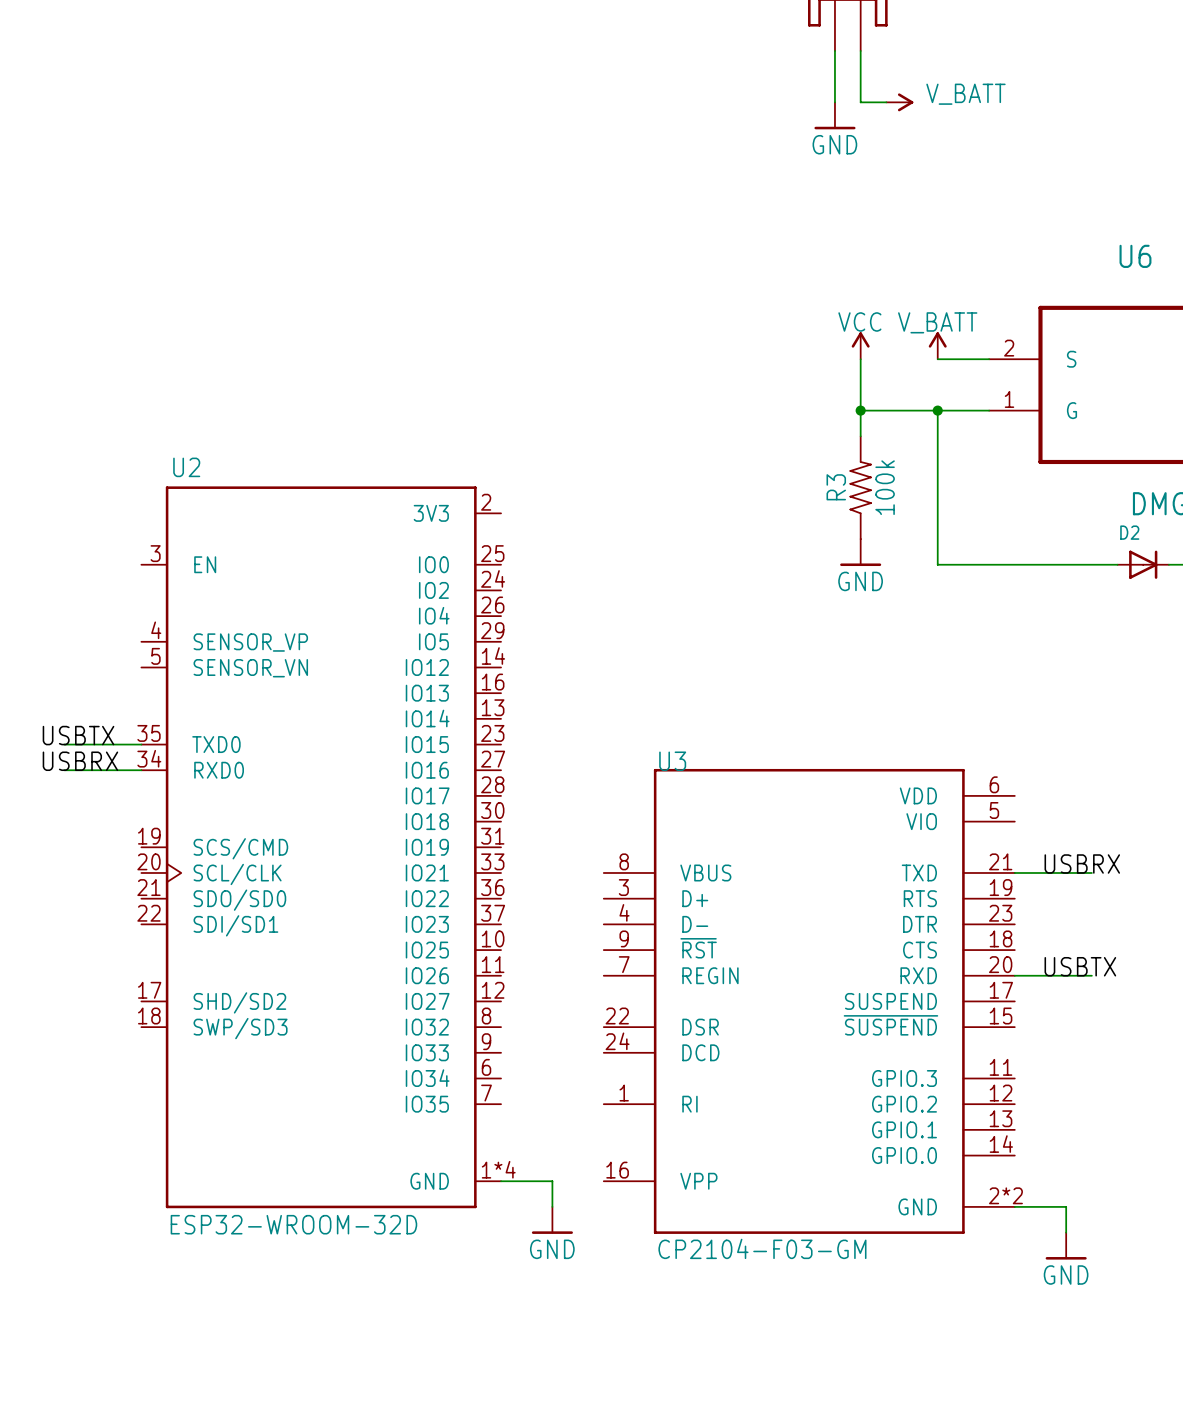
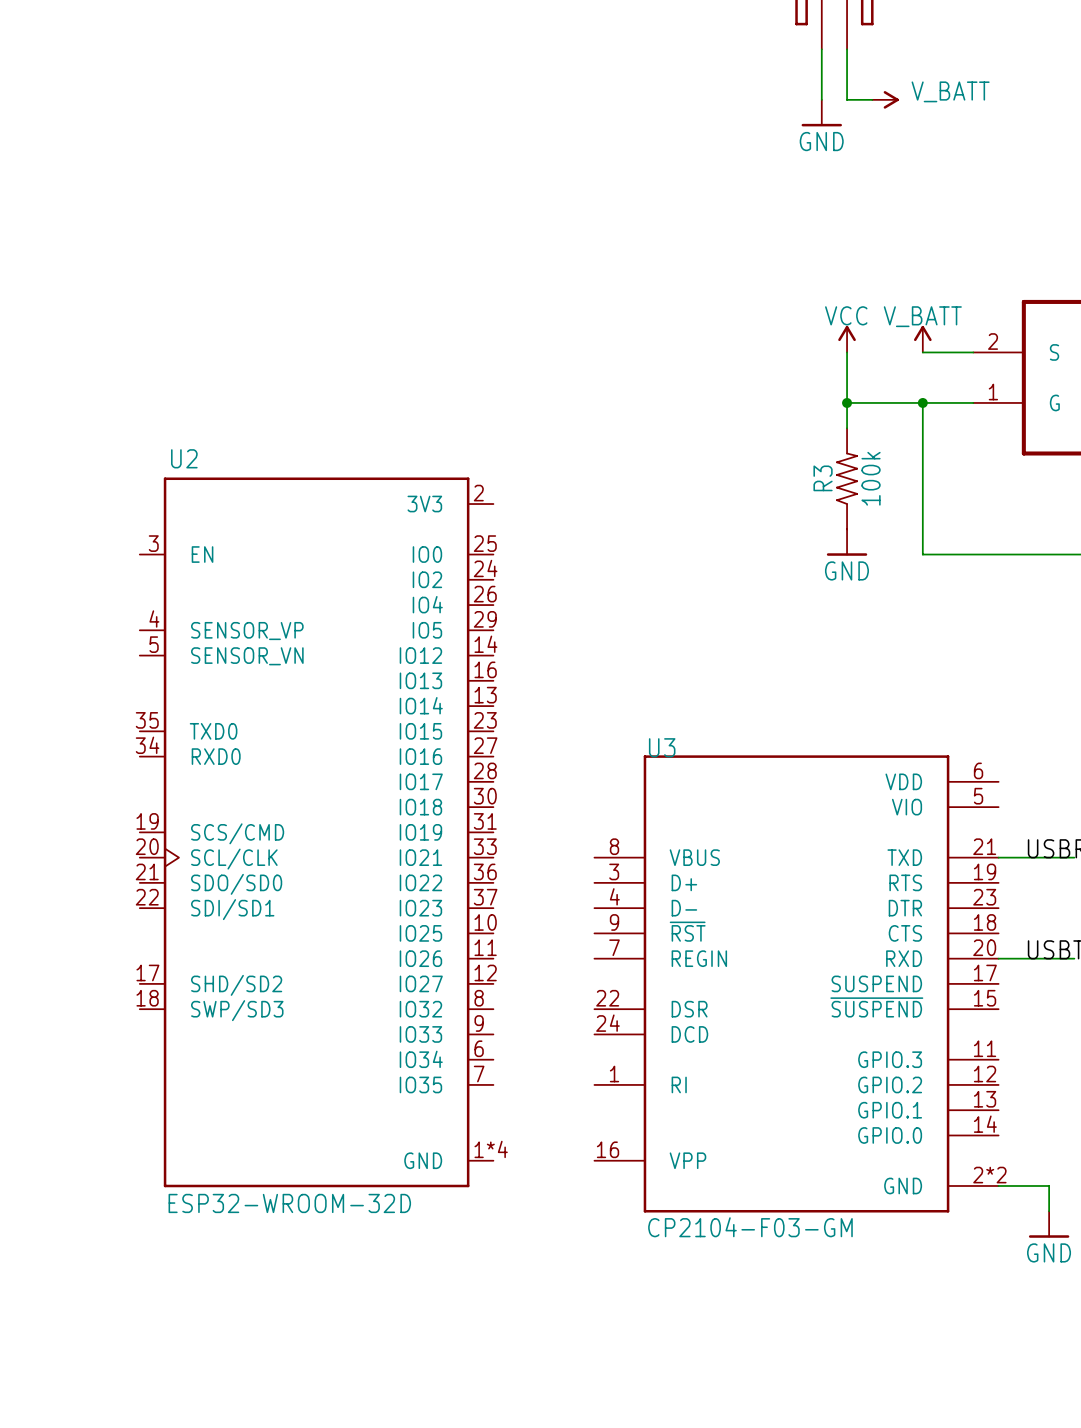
label: USBTX (78, 735) -> none
wire: (64, 744) (141, 744) -> none
label: USBRX (80, 761) -> none
wire: (64, 770) (141, 770) -> none
wire: (501, 1181) (552, 1181) (552, 1206) -> none
power symbol: GND (552, 1220) -> none

